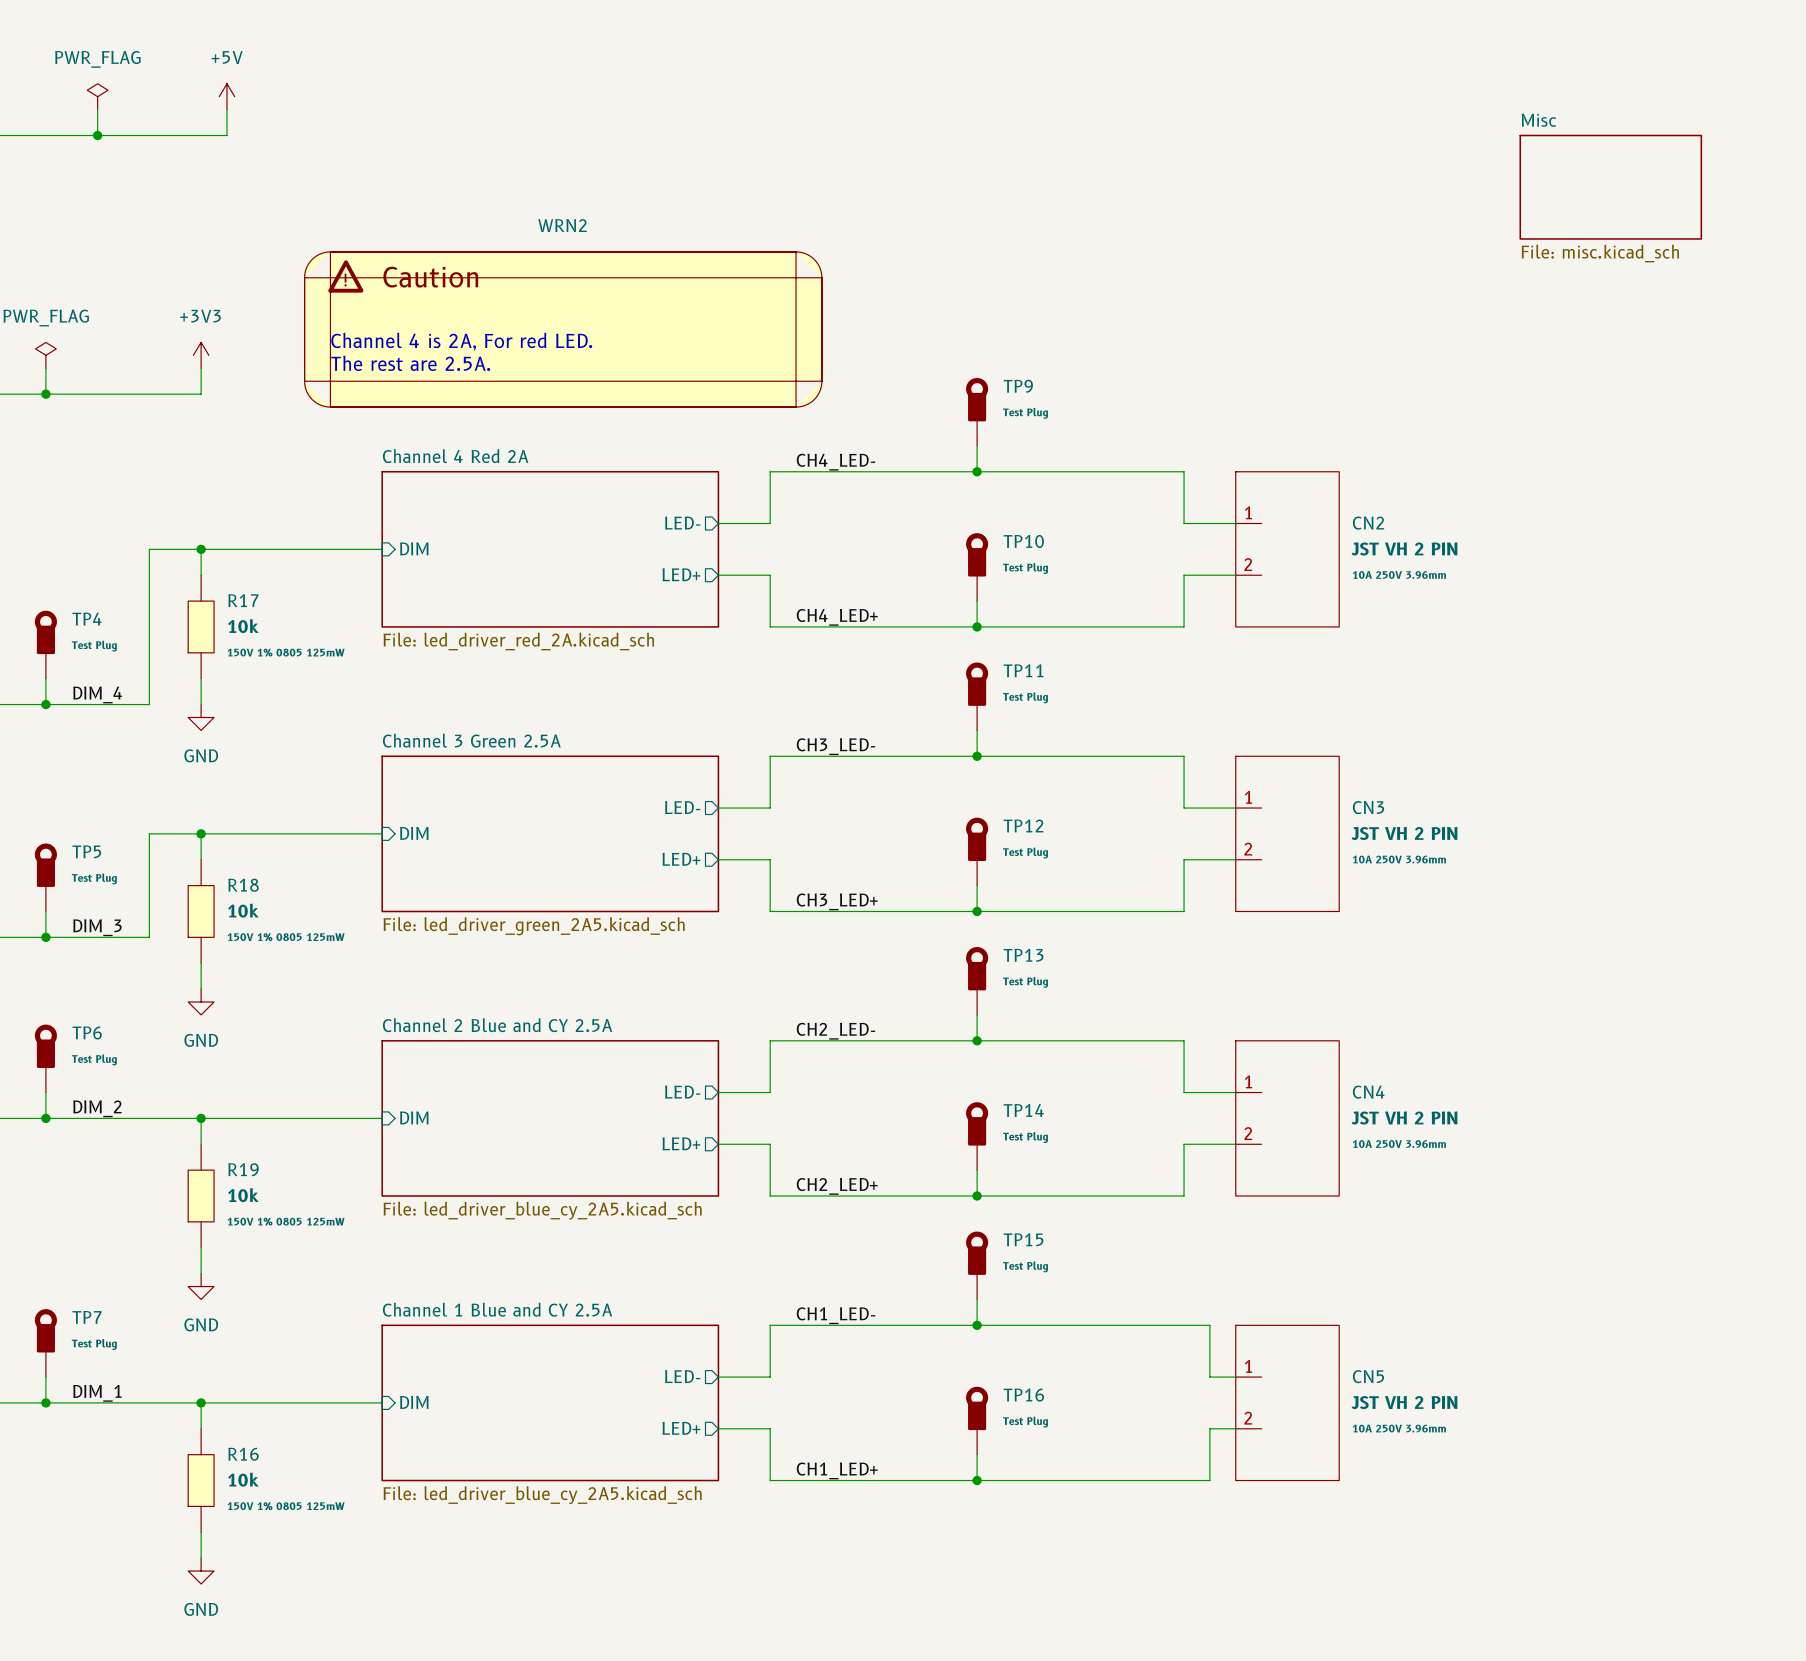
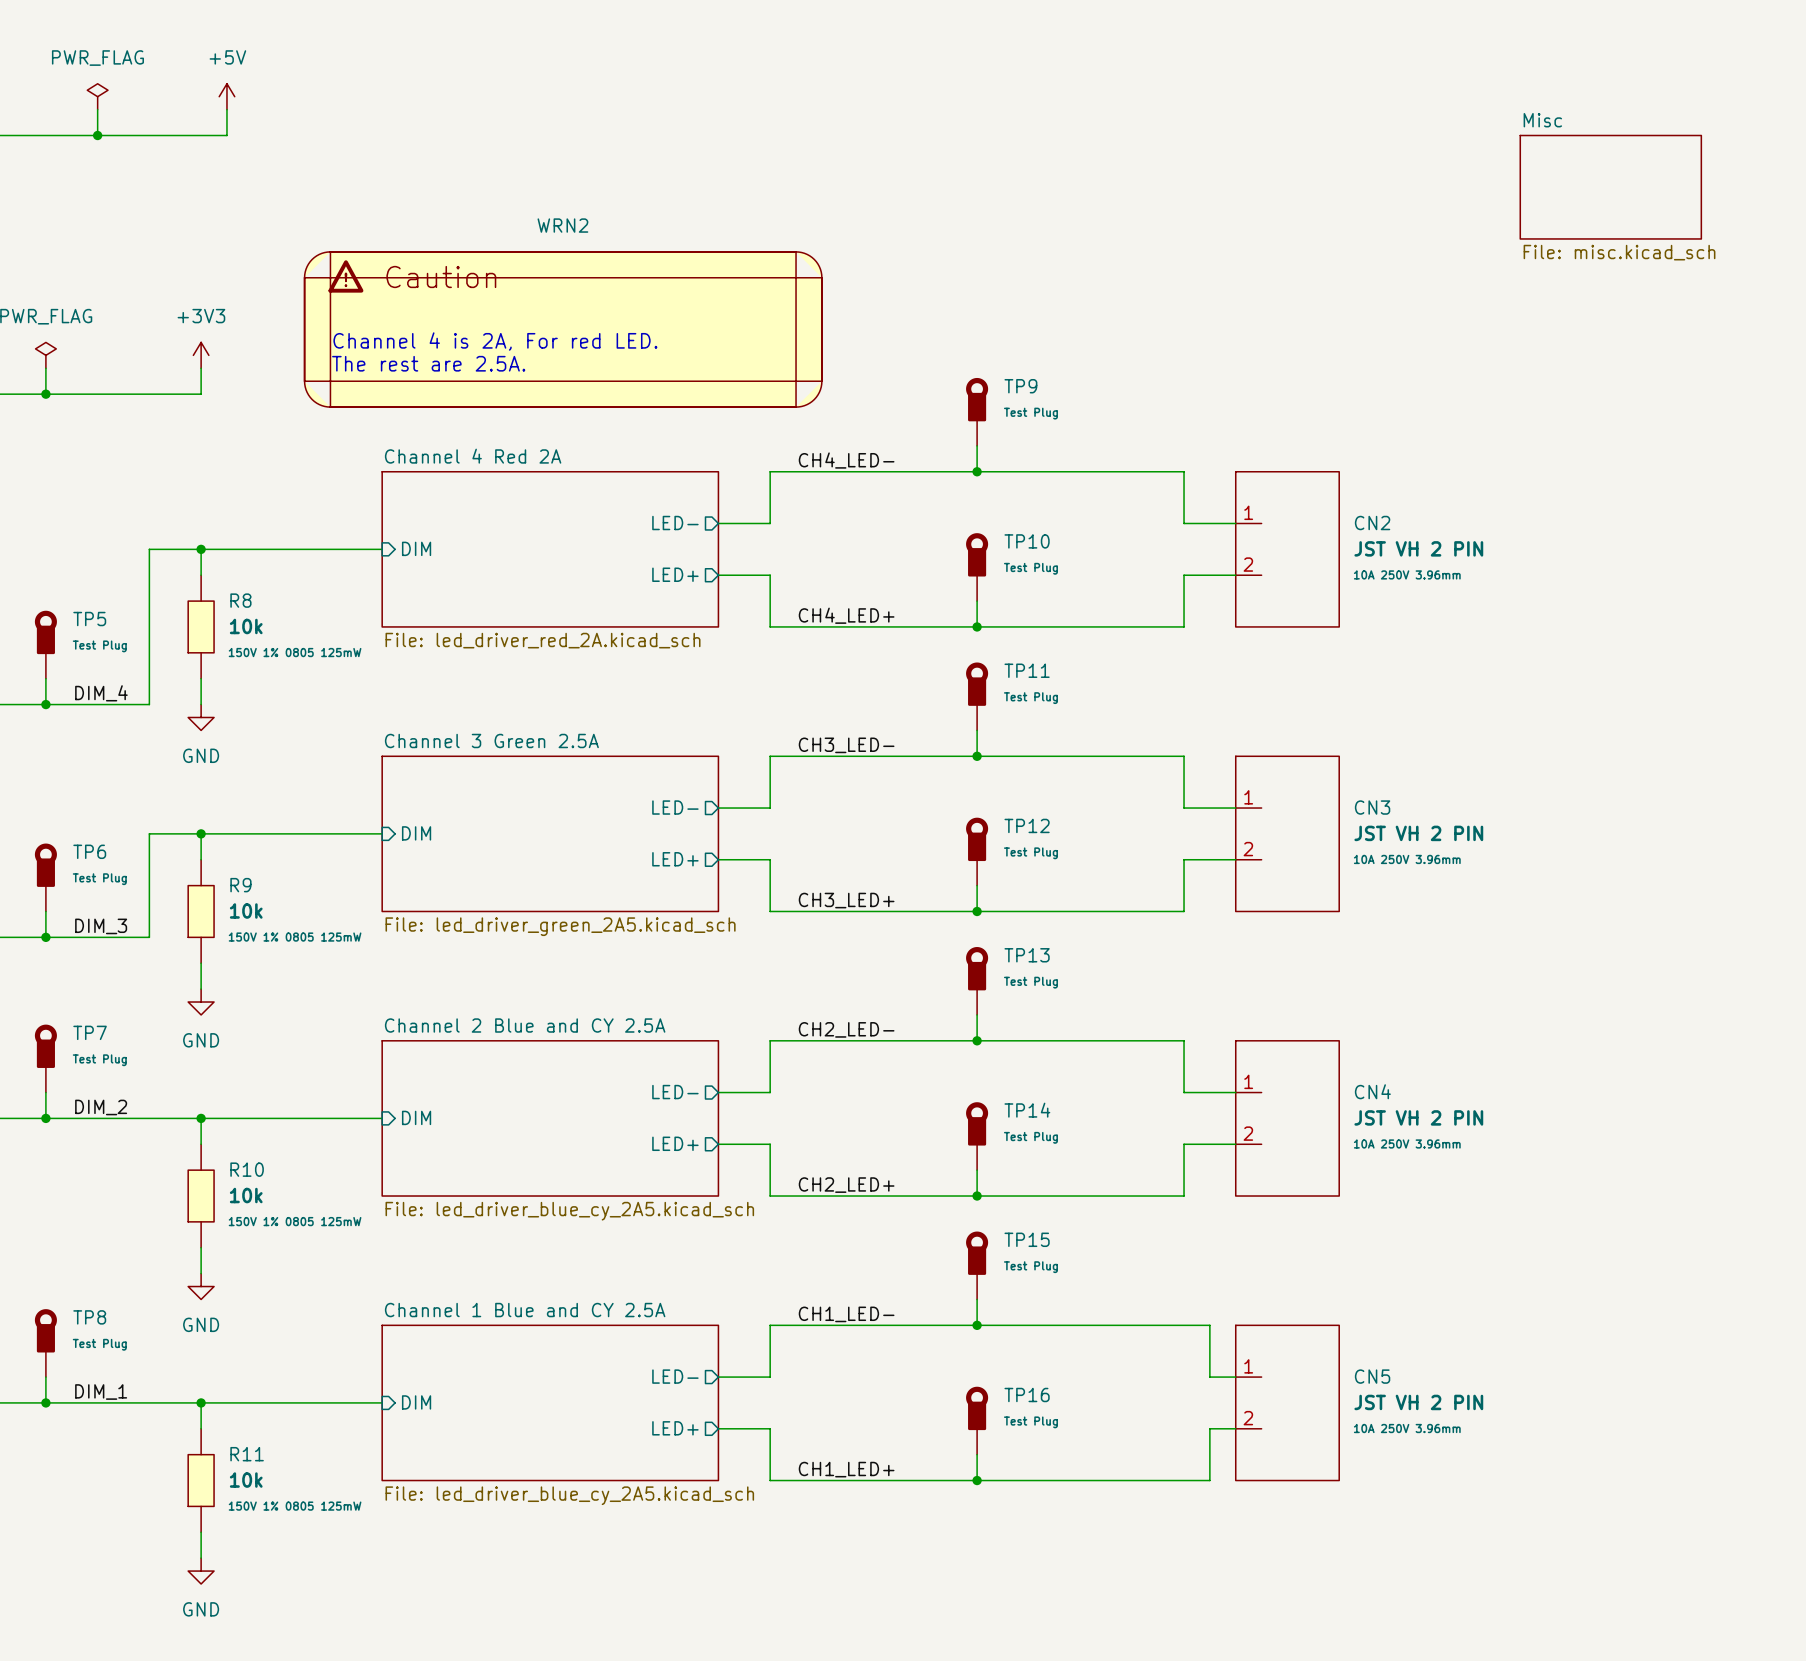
R17 name: R17 (243, 600) -> R8 (240, 600)
TP4 name: TP4 (87, 619) -> TP5 (89, 619)
TP5 name: TP5 (86, 851) -> TP6 (89, 851)
R18 name: R18 (243, 885) -> R9 (240, 885)
TP6 name: TP6 (87, 1032) -> TP7 (90, 1032)
R19 name: R19 (243, 1169) -> R10 (247, 1169)
TP7 name: TP7 (87, 1317) -> TP8 (89, 1317)
R16 name: R16 (243, 1454) -> R11 (247, 1454)

